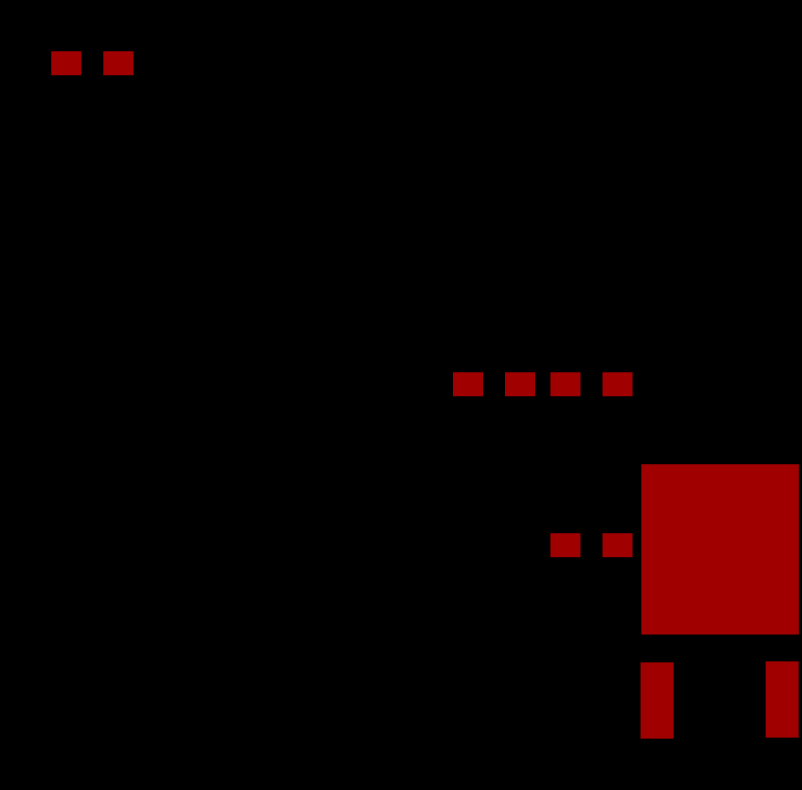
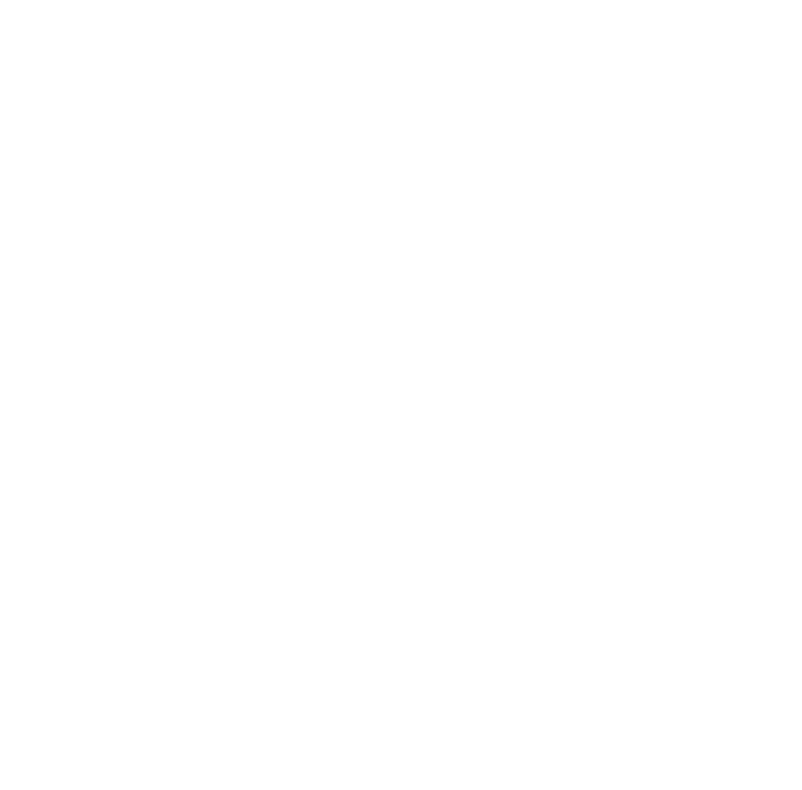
part: (92, 63) -> none
part: (493, 384) -> none
part: (591, 384) -> none
part: (591, 545) -> none
part: (719, 601) -> none

